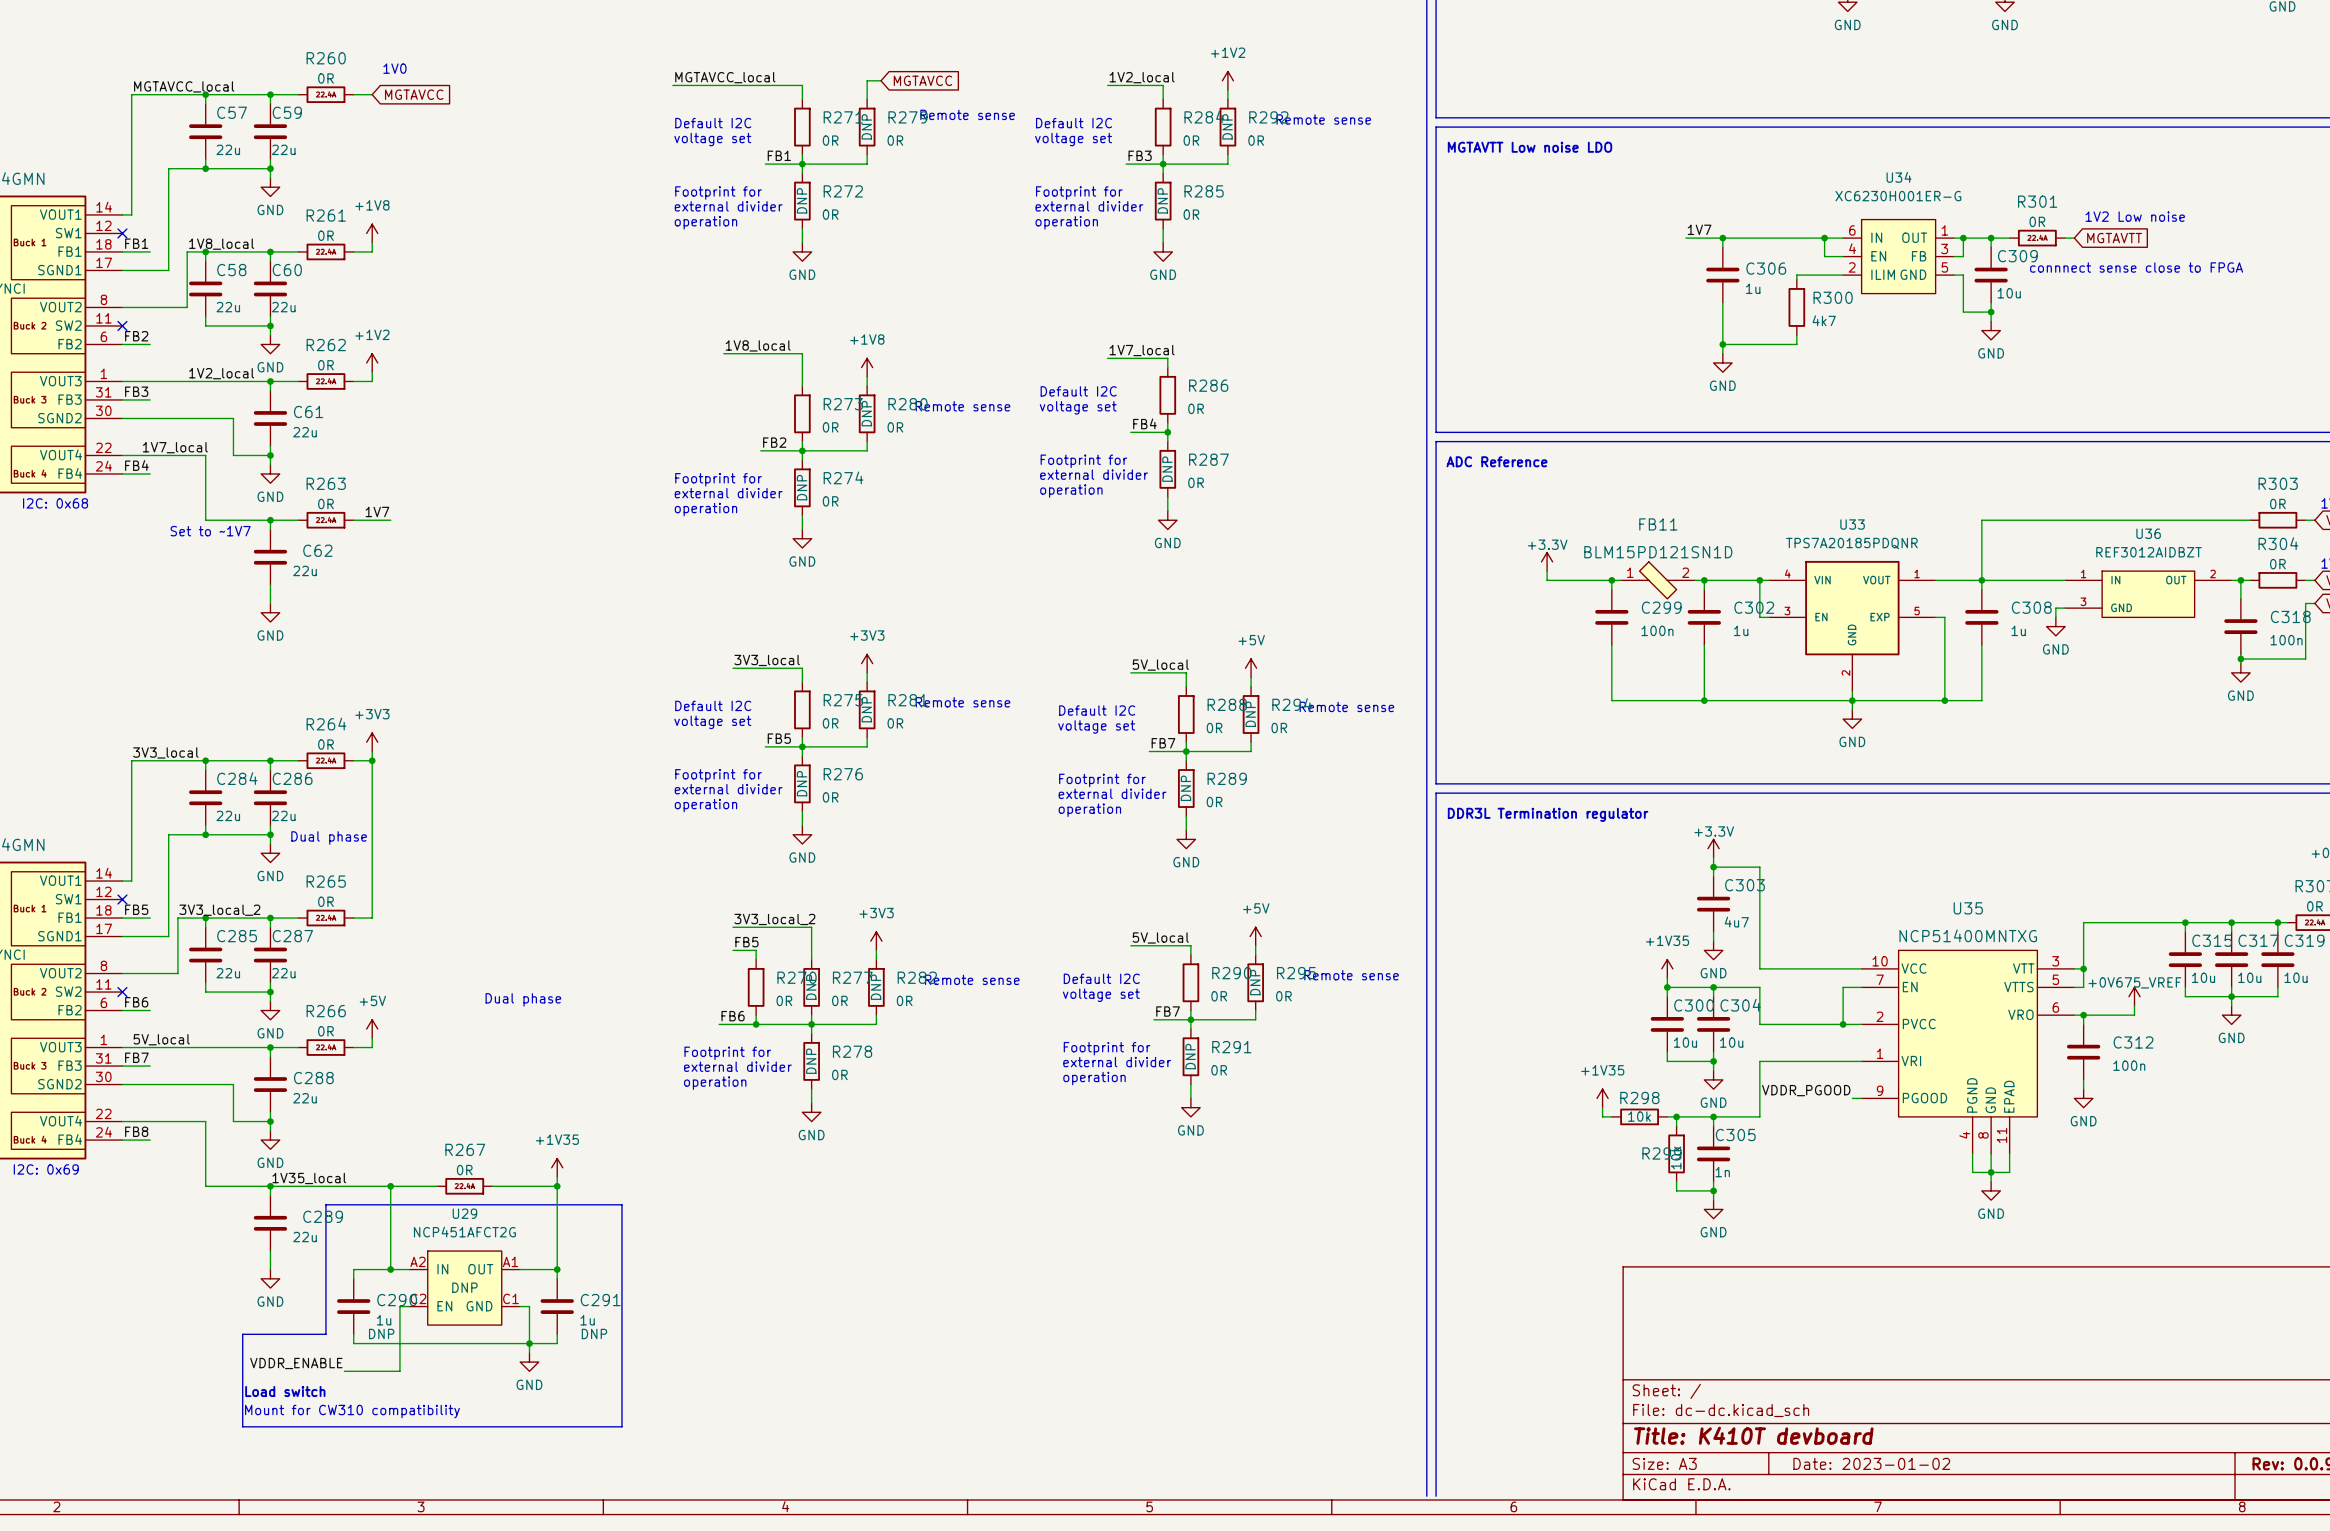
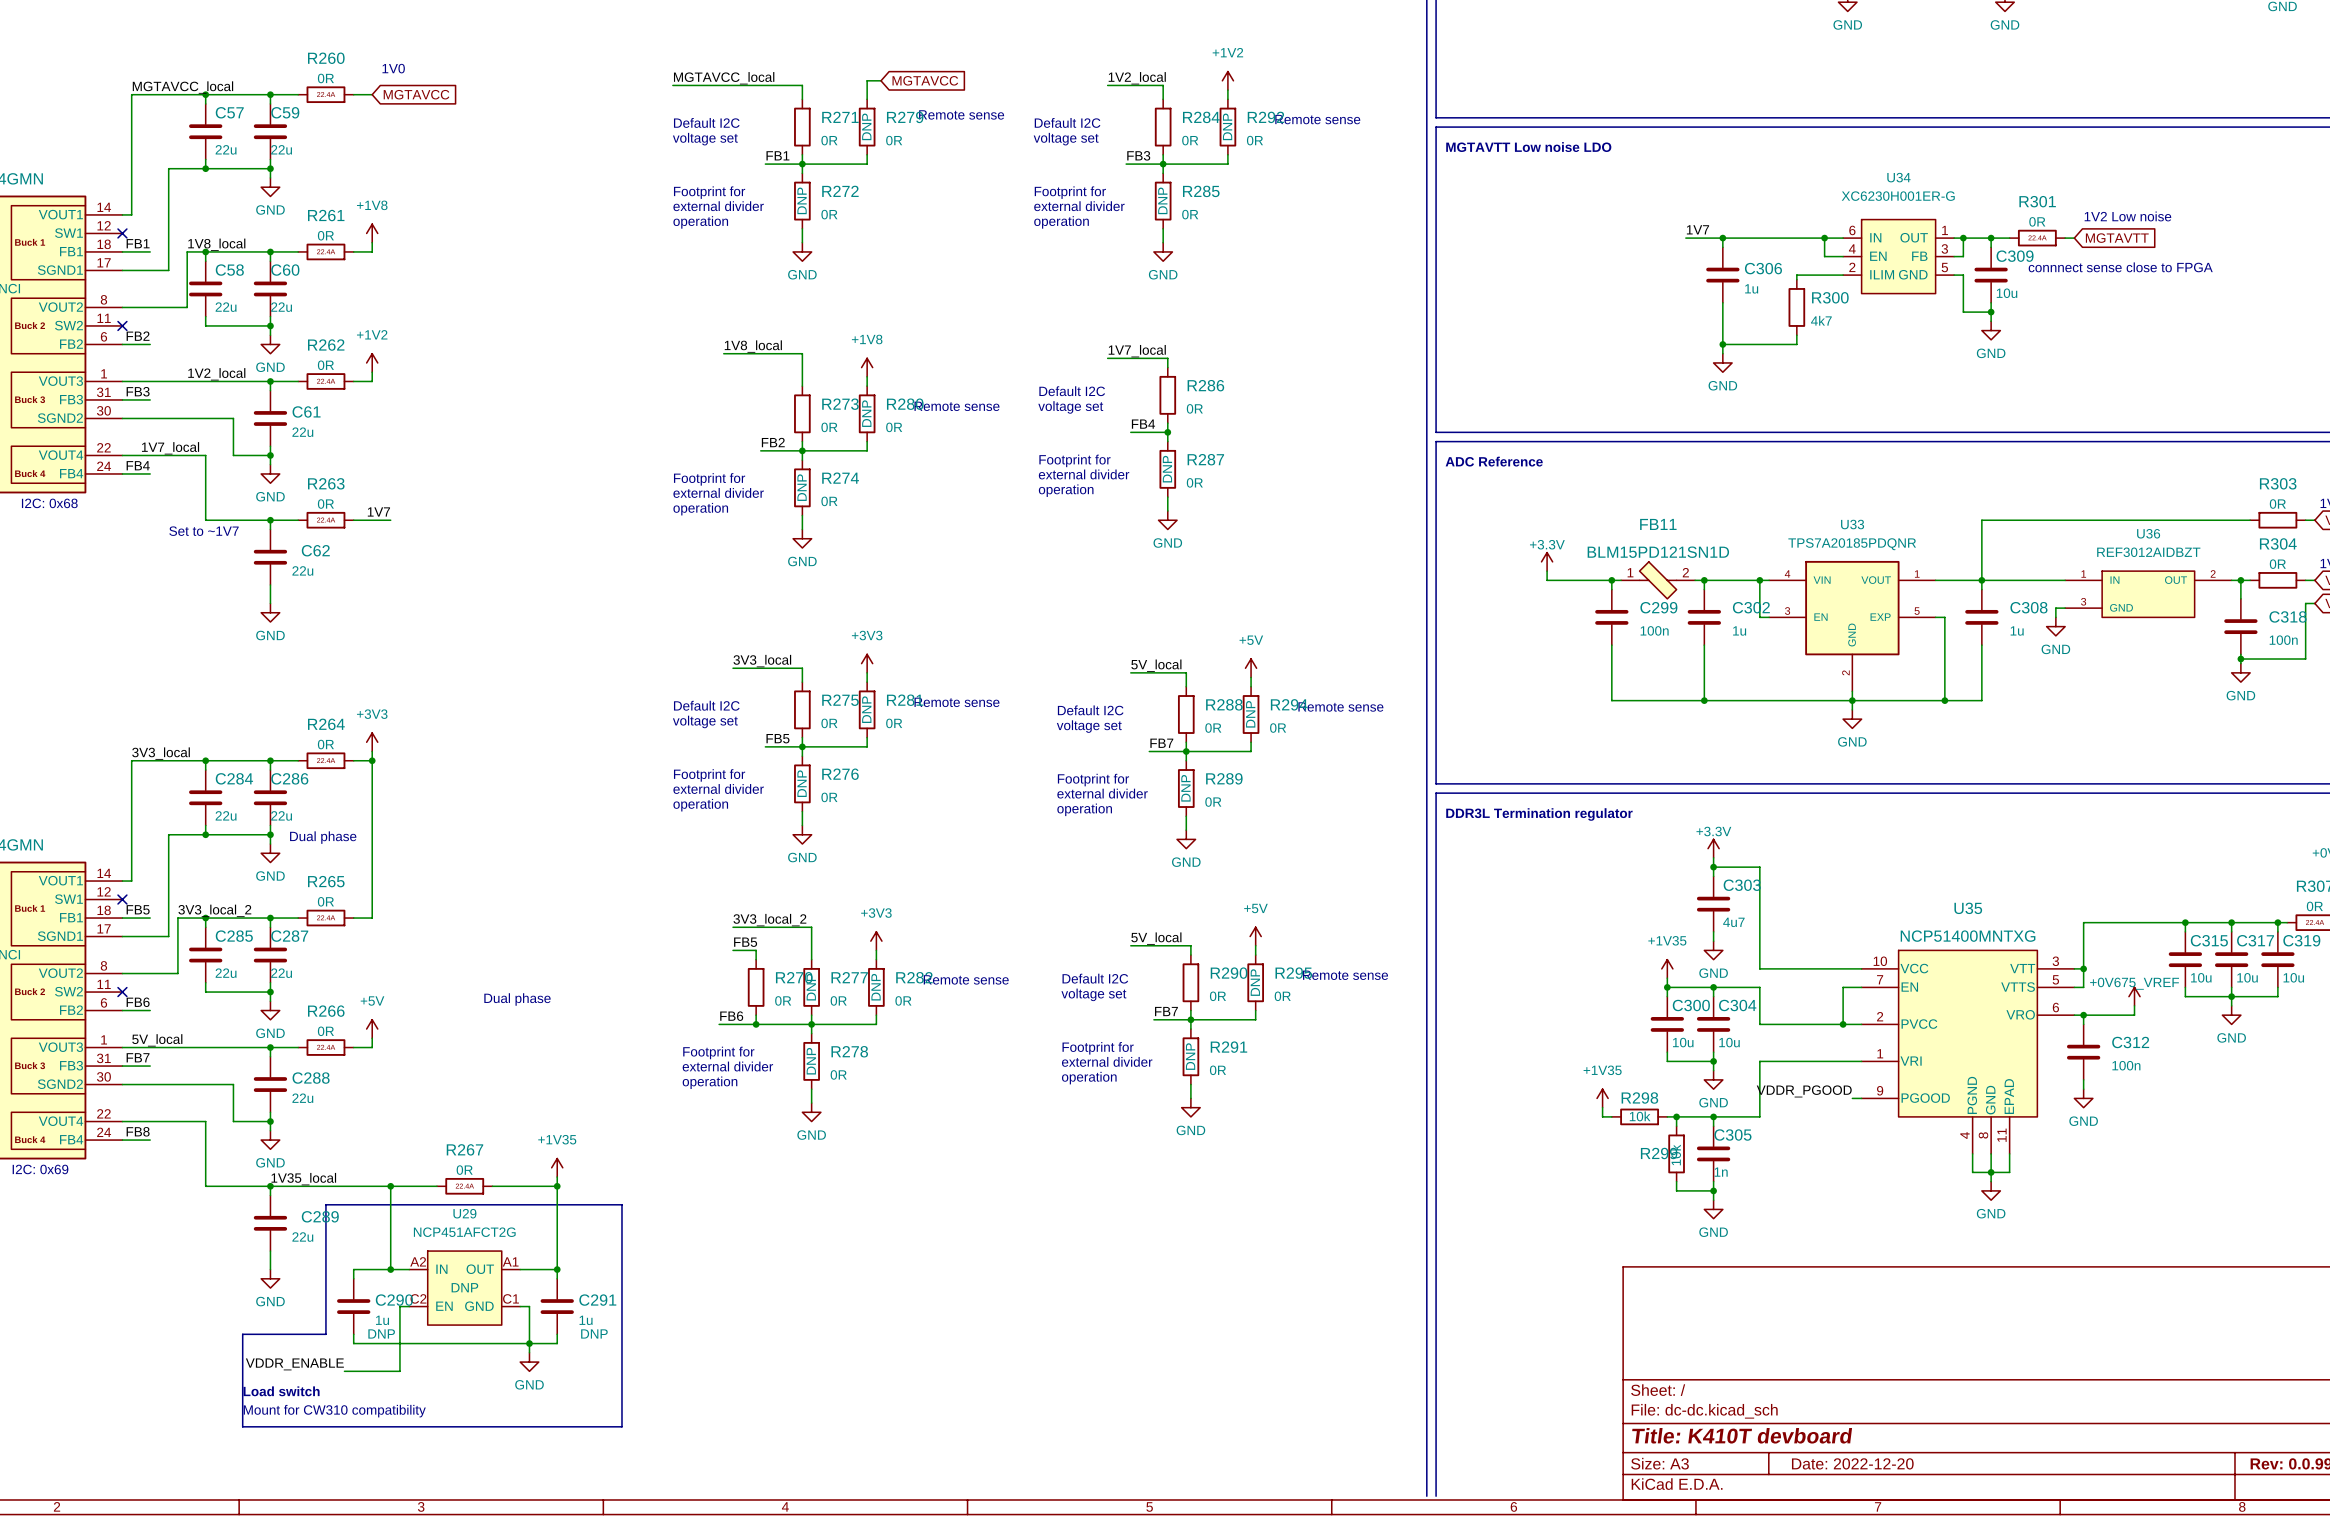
title block: Date: 2023-01-02 (1871, 1463) -> Date: 2022-12-20 (1852, 1463)

